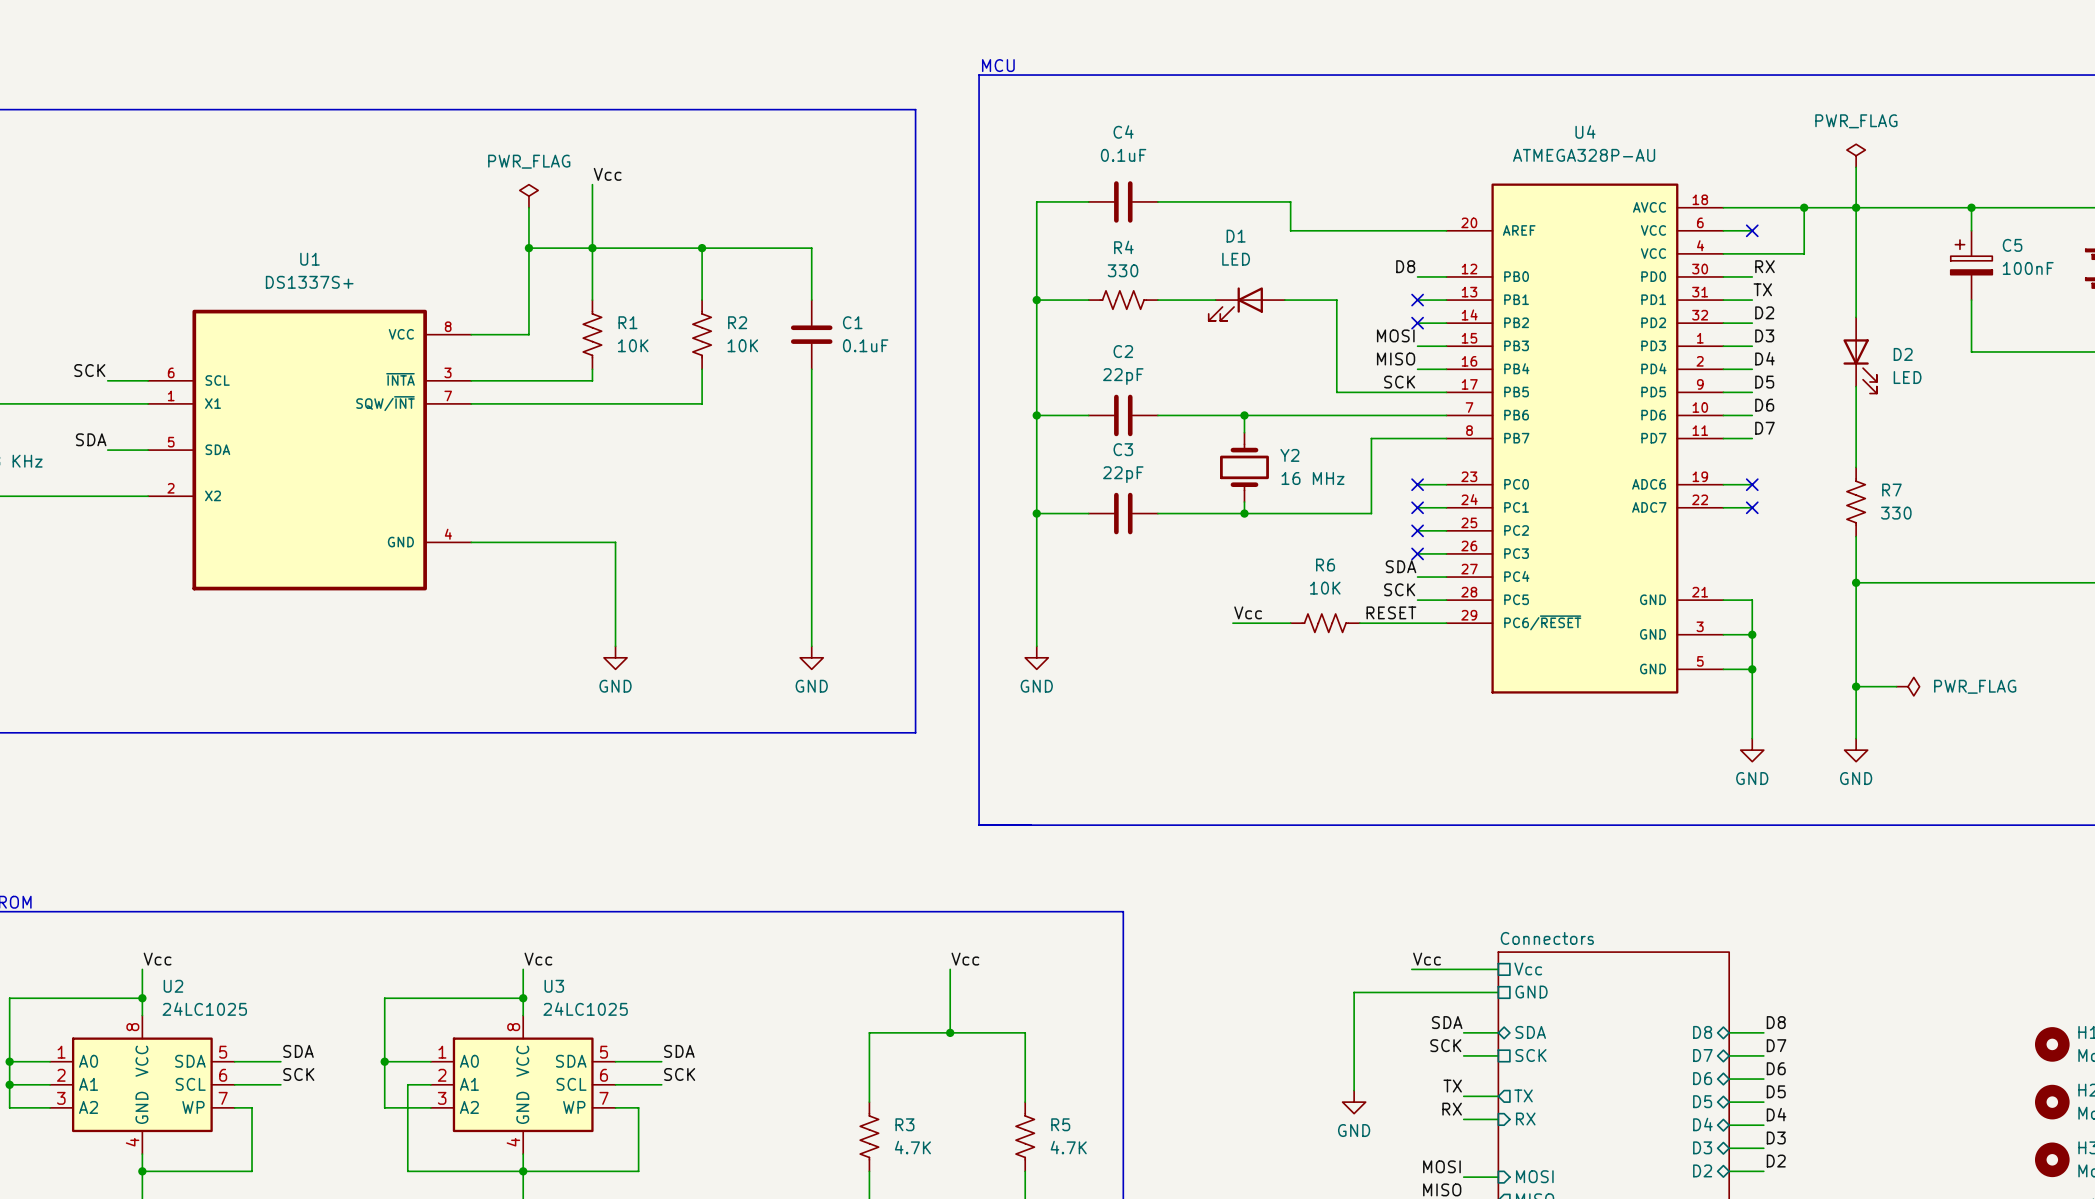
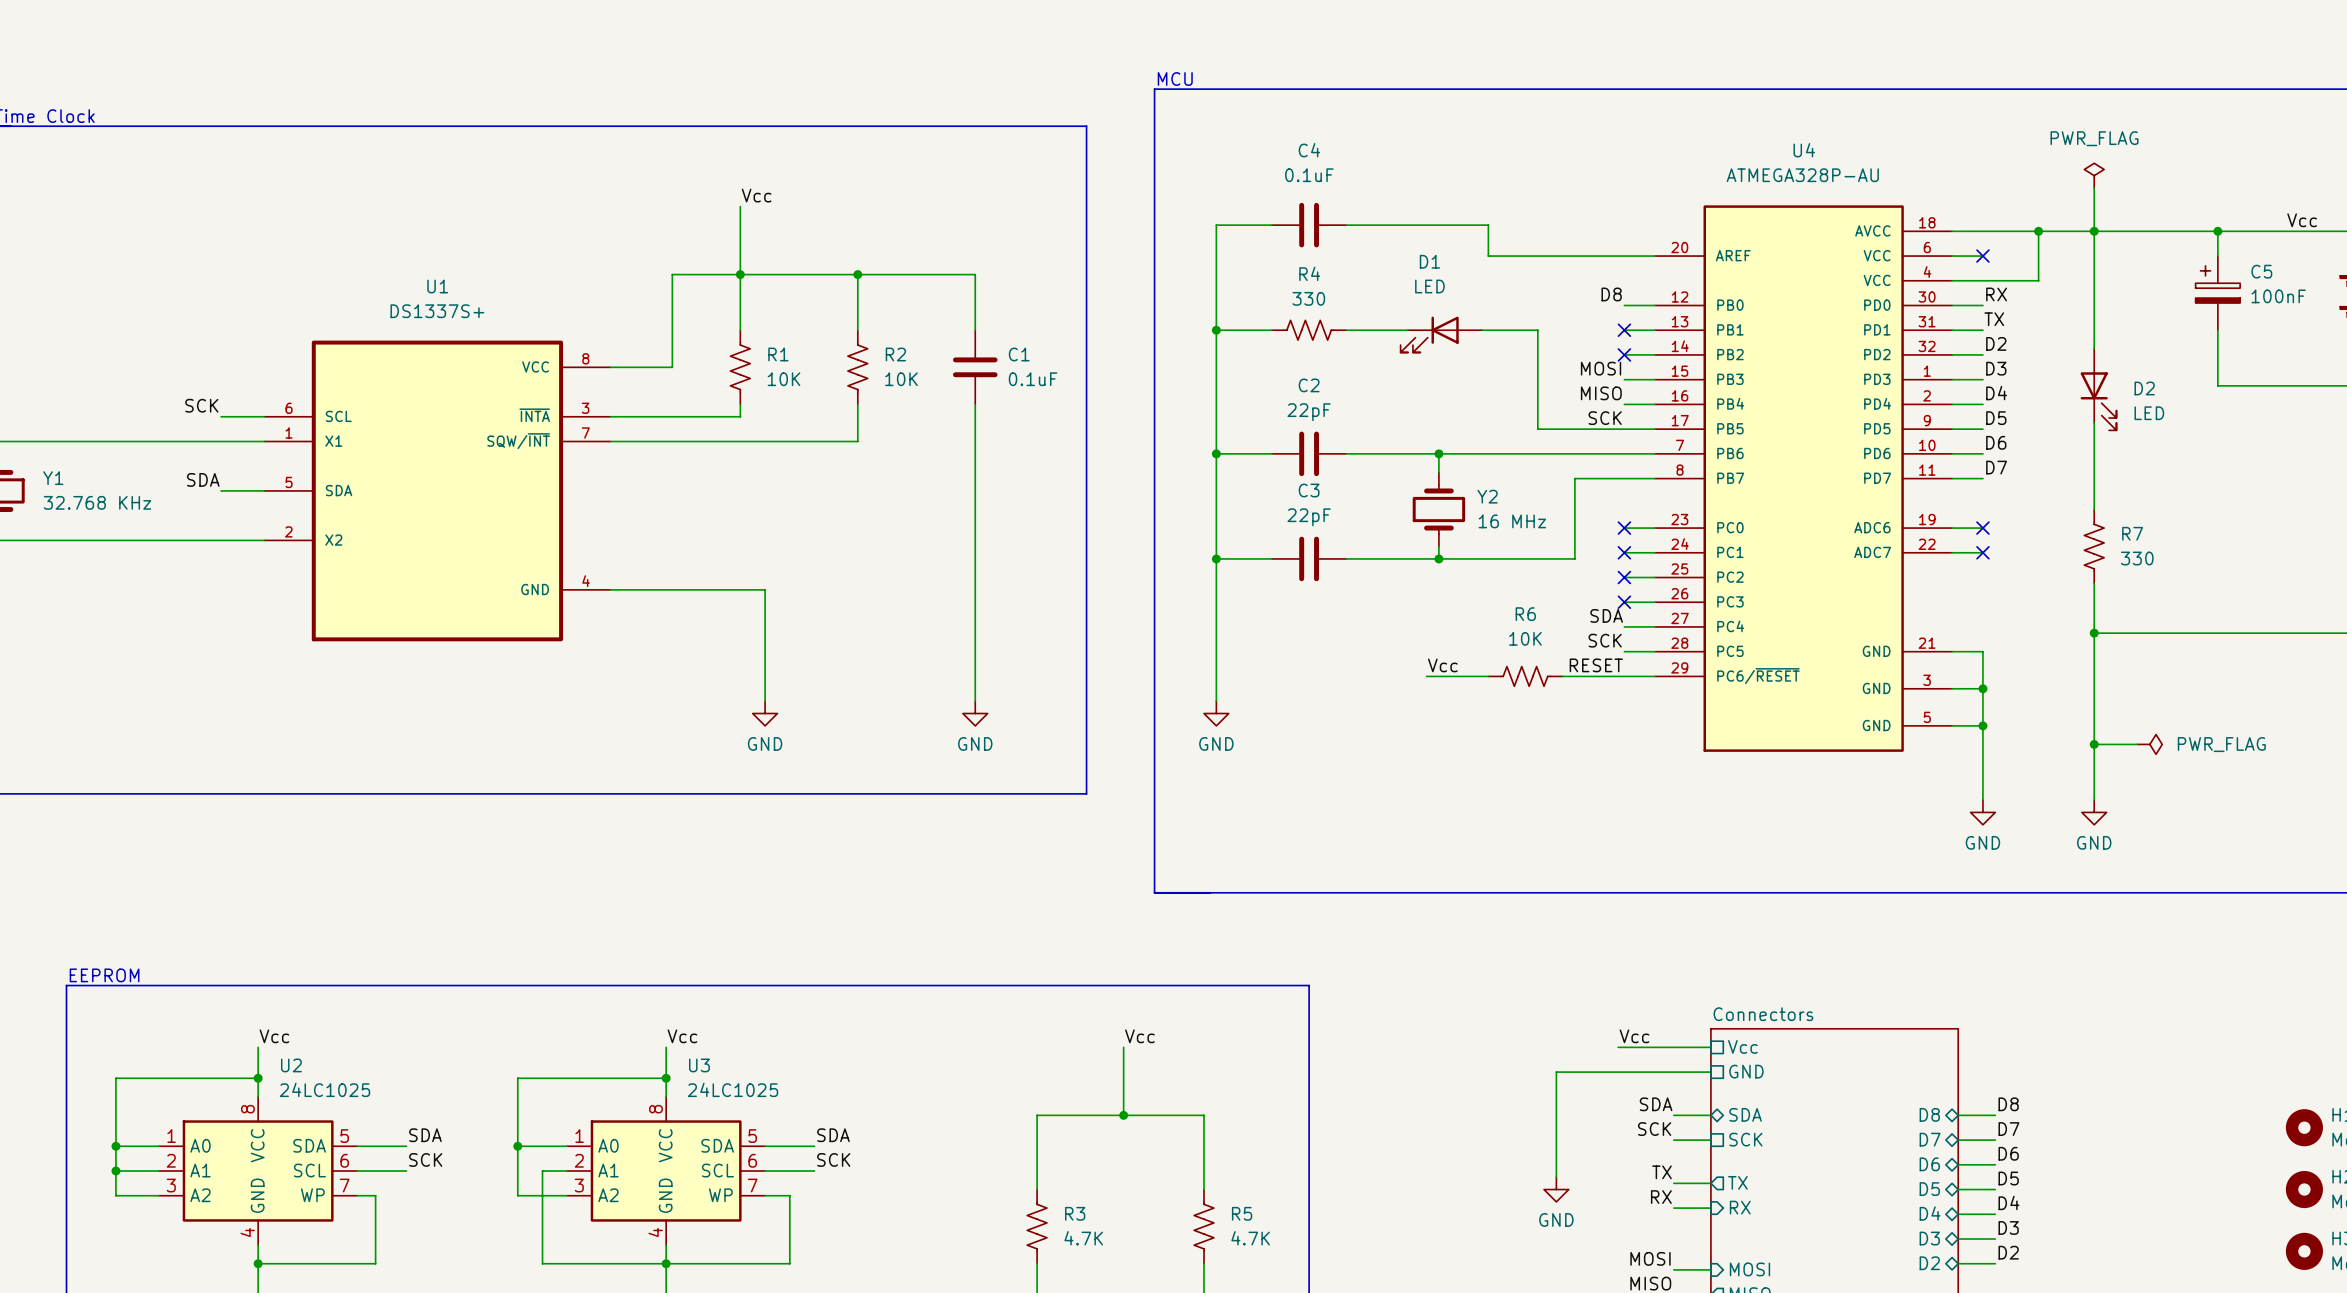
power symbol: PWR_FLAG (528, 196) -> none
label: none -> Vcc (2302, 220)
wire: (528, 207) (528, 248) -> none
junction: (528, 248) -> none

